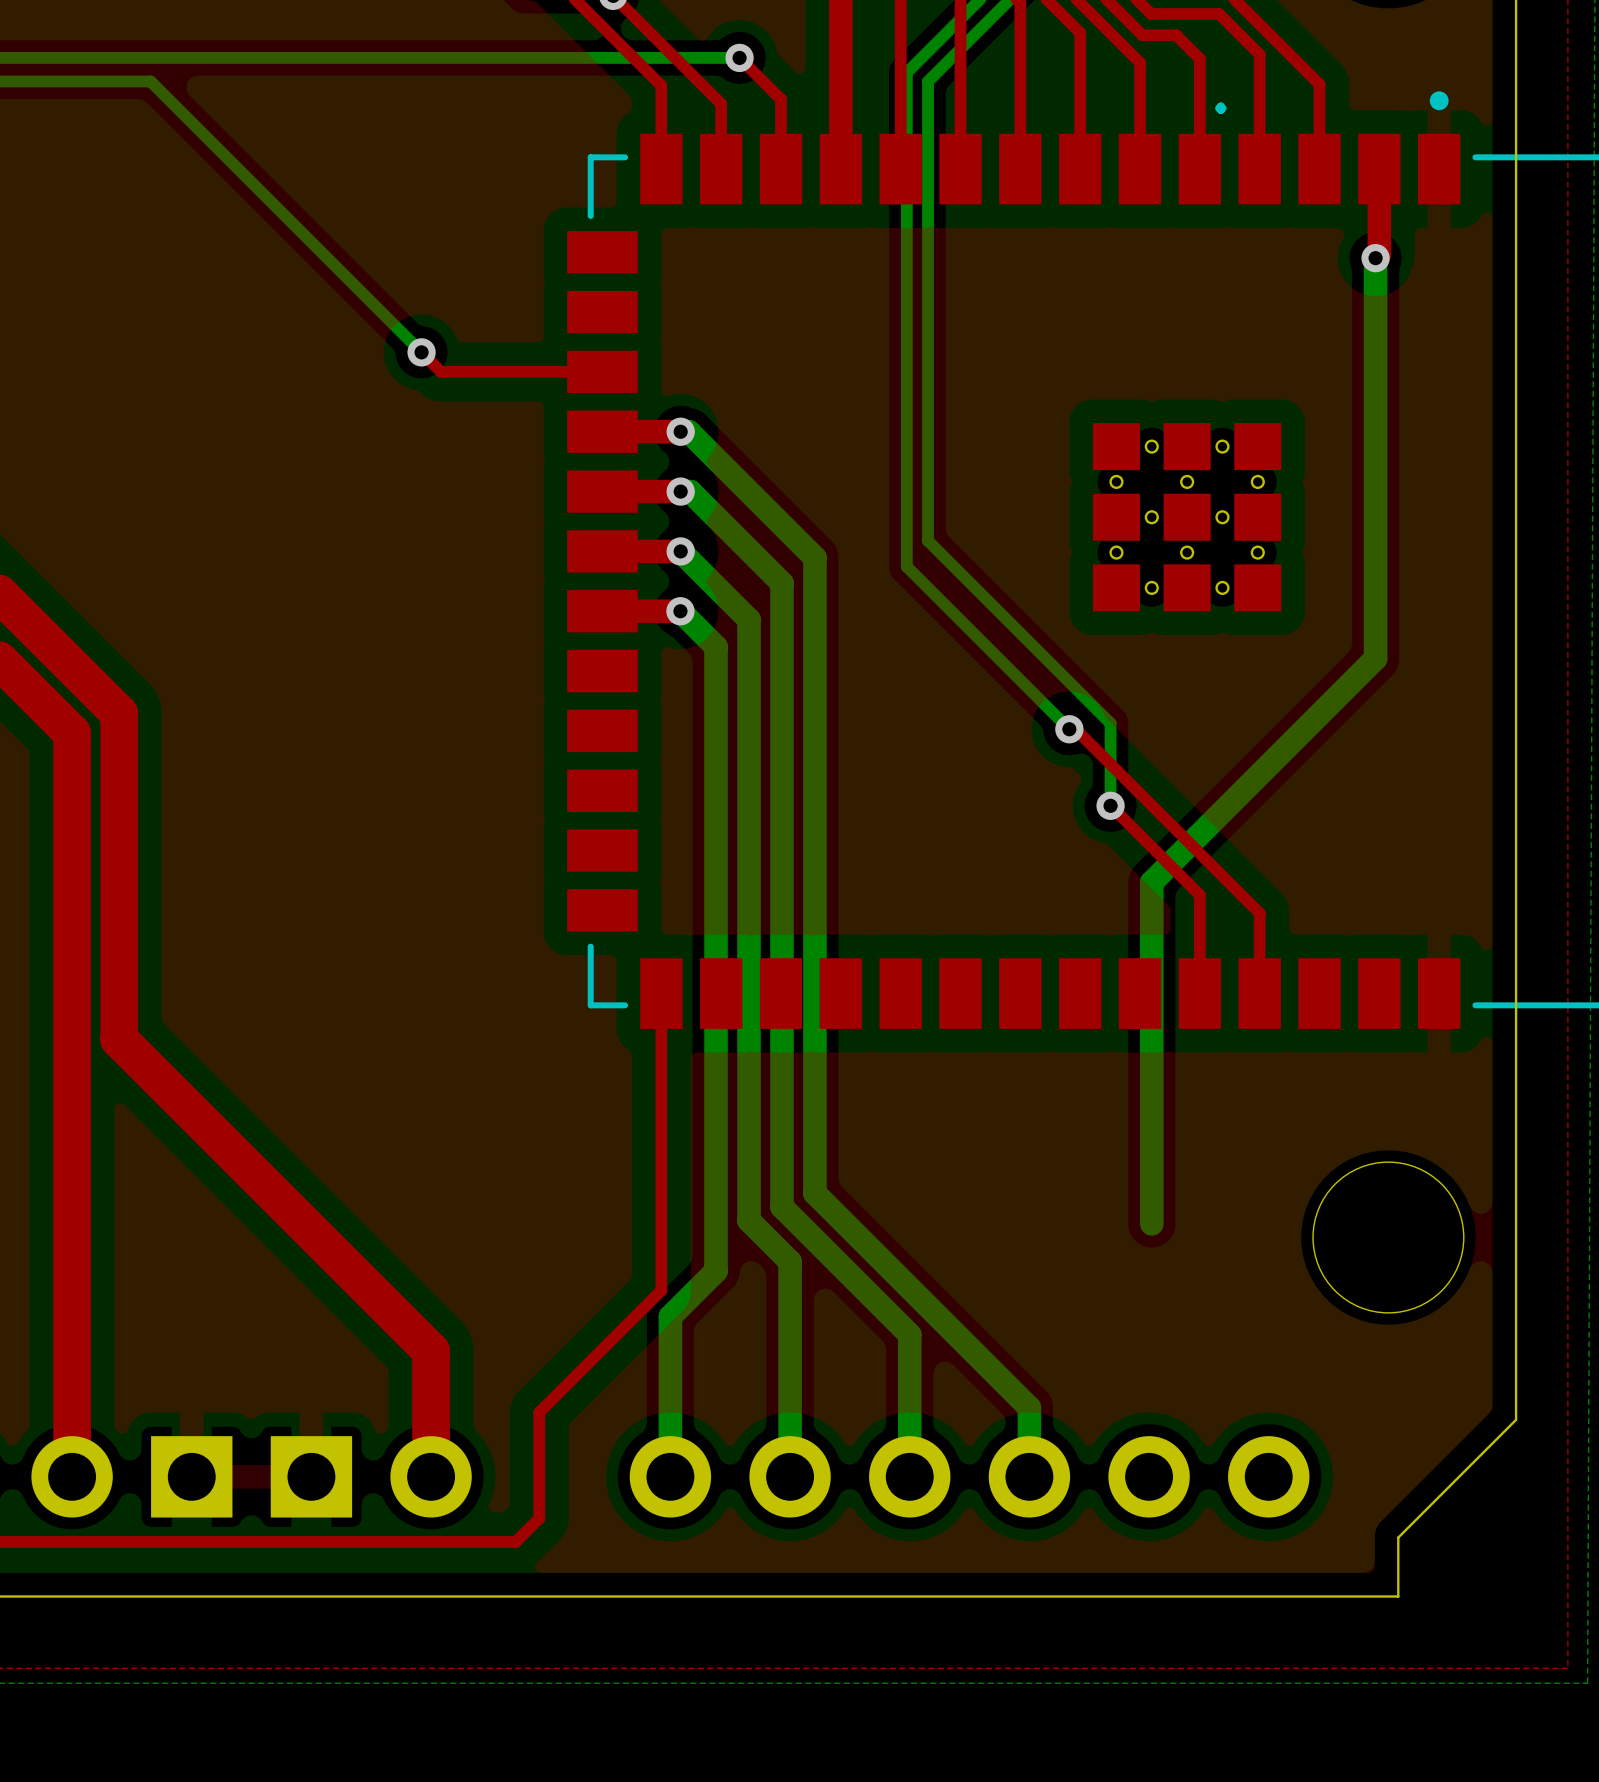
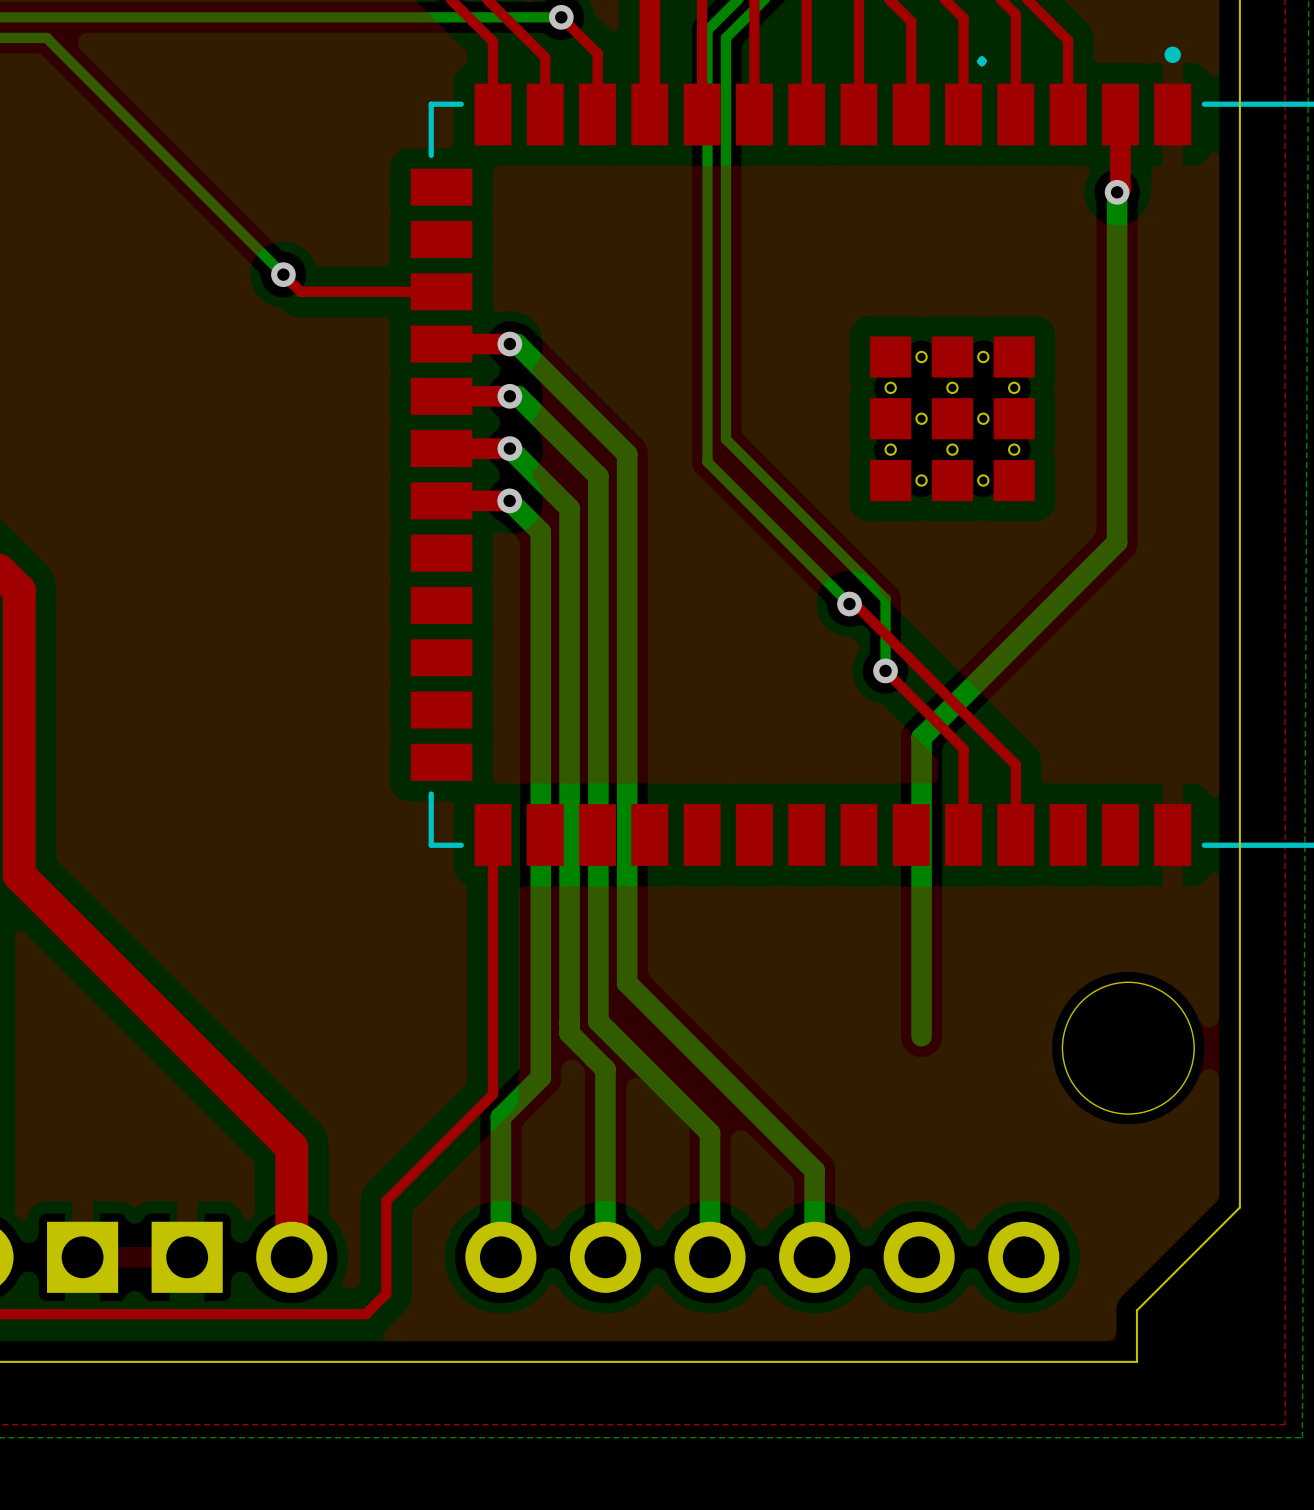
bottom track: (814, 1163) (814, 1193) (1029, 1407) -> (627, 983) (814, 1170) (814, 1196)

